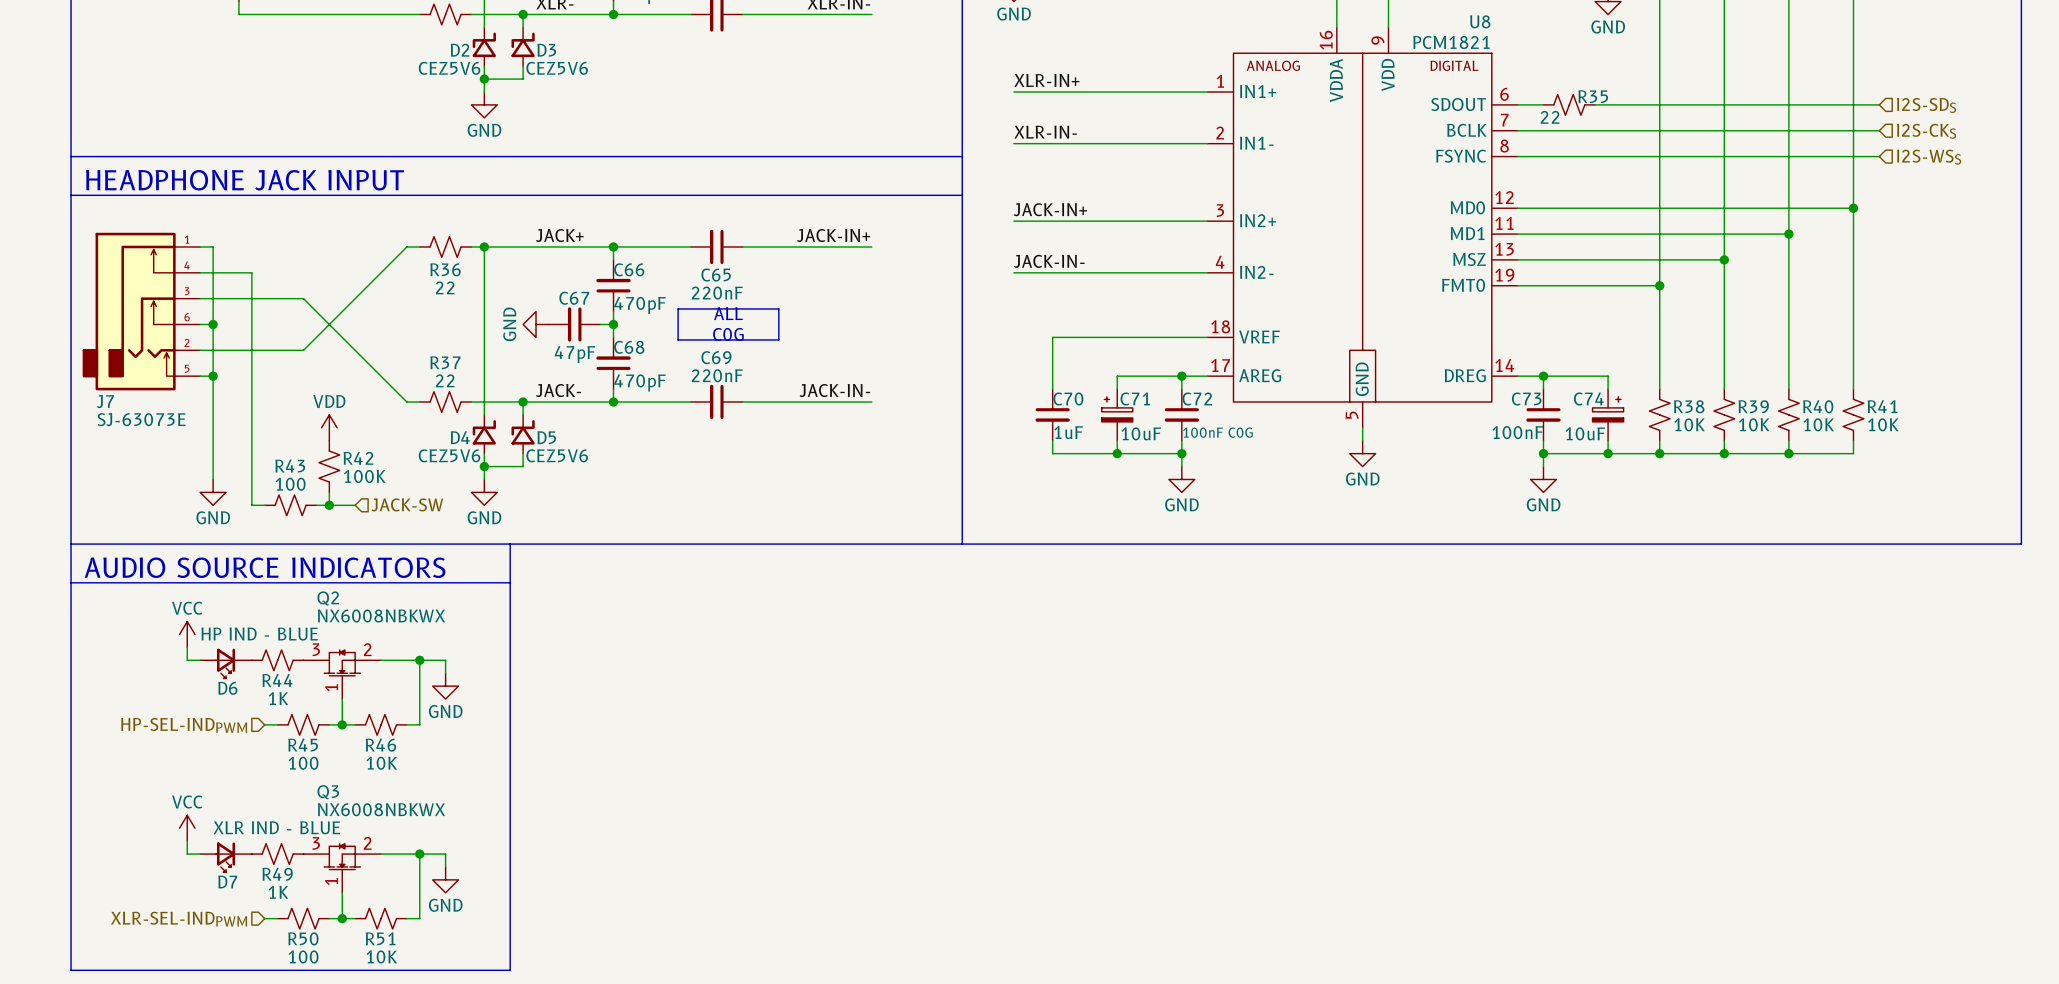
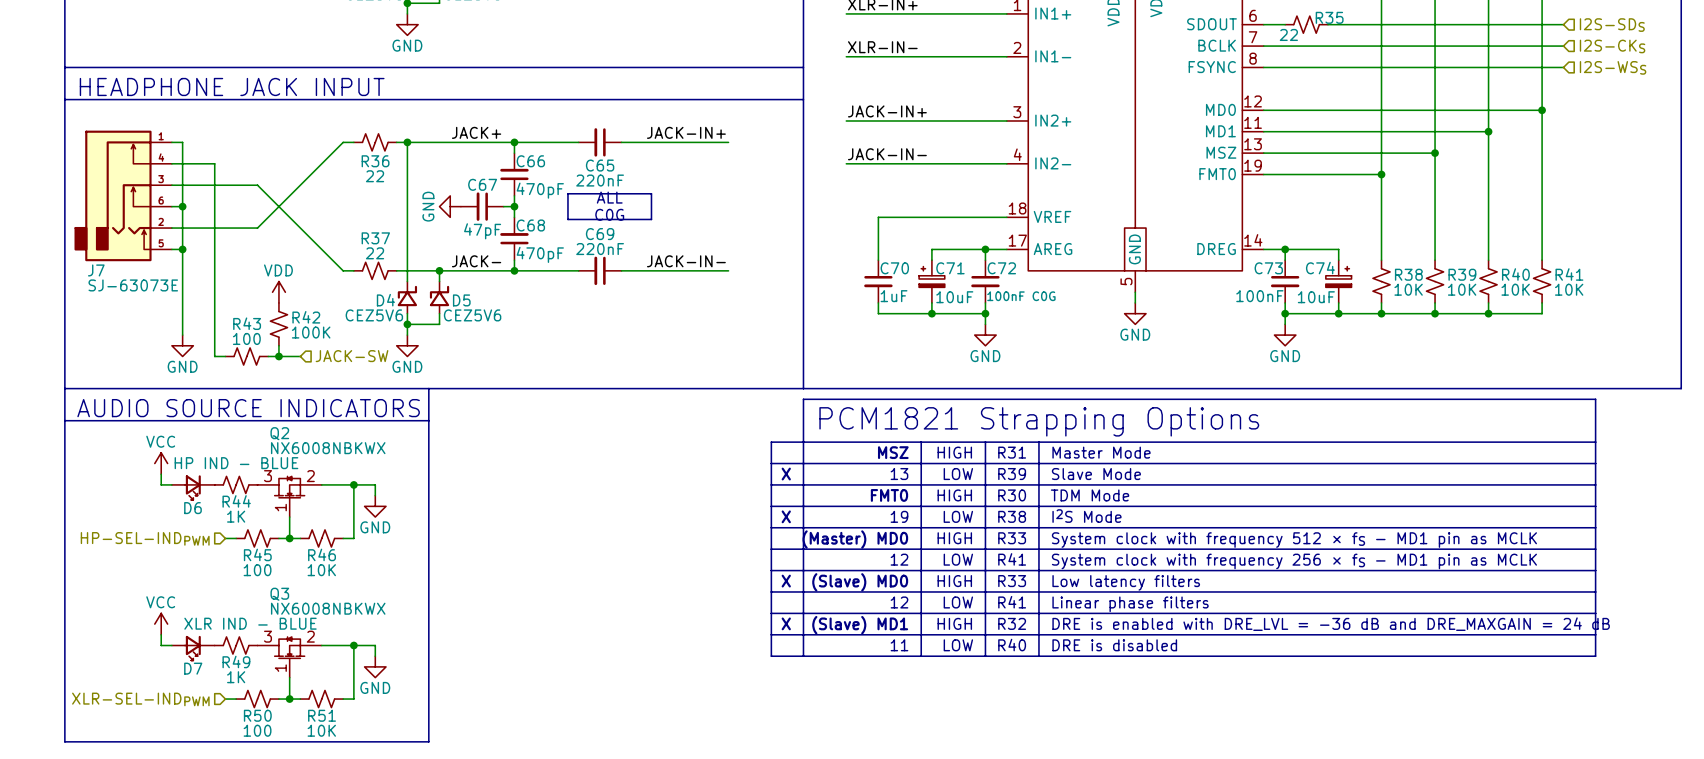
text: none -> PCM1821 Strapping Options (1039, 421)
line: none -> (921, 442) (921, 656)
line: none -> (985, 442) (985, 656)
line: none -> (1038, 442) (1038, 656)
line: none -> (1595, 442) (771, 442) (771, 656) (1595, 656) (1595, 399) (803, 399) (803, 656)
text: none -> Master Mode (1101, 452)
text: none -> MSZ (893, 452)
text: none -> HIGH (954, 452)
text: none -> R31 (1012, 452)
line: none -> (771, 463) (1595, 463)
text: none -> Slave Mode (1096, 474)
text: none -> X (786, 474)
text: none -> 13 (899, 474)
text: none -> LOW (958, 474)
text: none -> R39 (1012, 474)
line: none -> (771, 484) (1595, 484)
text: none -> TDM Mode (1090, 495)
text: none -> FMT0 (889, 495)
text: none -> HIGH (954, 495)
text: none -> R30 (1012, 495)
line: none -> (771, 506) (1595, 506)
text: none -> I2S Mode (1086, 516)
text: none -> X (786, 516)
text: none -> 19 (899, 516)
text: none -> LOW (958, 516)
text: none -> R38 (1012, 516)
line: none -> (771, 527) (1595, 527)
text: none -> HIGH (954, 538)
text: none -> R33 (1012, 538)
text: none -> (Master) MD0 (855, 539)
text: none -> System clock with frequency 512 × fS - MD1 pin as MCLK (1294, 540)
line: none -> (771, 549) (1595, 549)
text: none -> 12 (899, 559)
text: none -> LOW (958, 559)
text: none -> R41 (1012, 559)
text: none -> System clock with frequency 256 × fS - MD1 pin as MCLK (1294, 561)
line: none -> (771, 570) (1595, 570)
text: none -> X (786, 581)
text: none -> HIGH (954, 581)
text: none -> R33 (1012, 581)
text: none -> (Slave) MD0 (860, 582)
text: none -> Low latency filters (1126, 582)
line: none -> (771, 591) (1595, 591)
text: none -> 12 (899, 602)
text: none -> LOW (958, 602)
text: none -> R41 (1012, 602)
text: none -> Linear phase filters (1130, 604)
line: none -> (771, 613) (1595, 613)
text: none -> X (786, 623)
text: none -> R32 (1012, 623)
text: none -> HIGH (954, 623)
text: none -> (Slave) MD1 (860, 625)
text: none -> DRE is enabled with DRE_LVL = -36 dB and DRE_MAXGAIN = 24 dB (1331, 624)
line: none -> (771, 634) (1595, 634)
text: none -> 11 (899, 645)
text: none -> LOW (958, 645)
text: none -> R40 (1012, 645)
text: none -> DRE is disabled (1114, 645)

